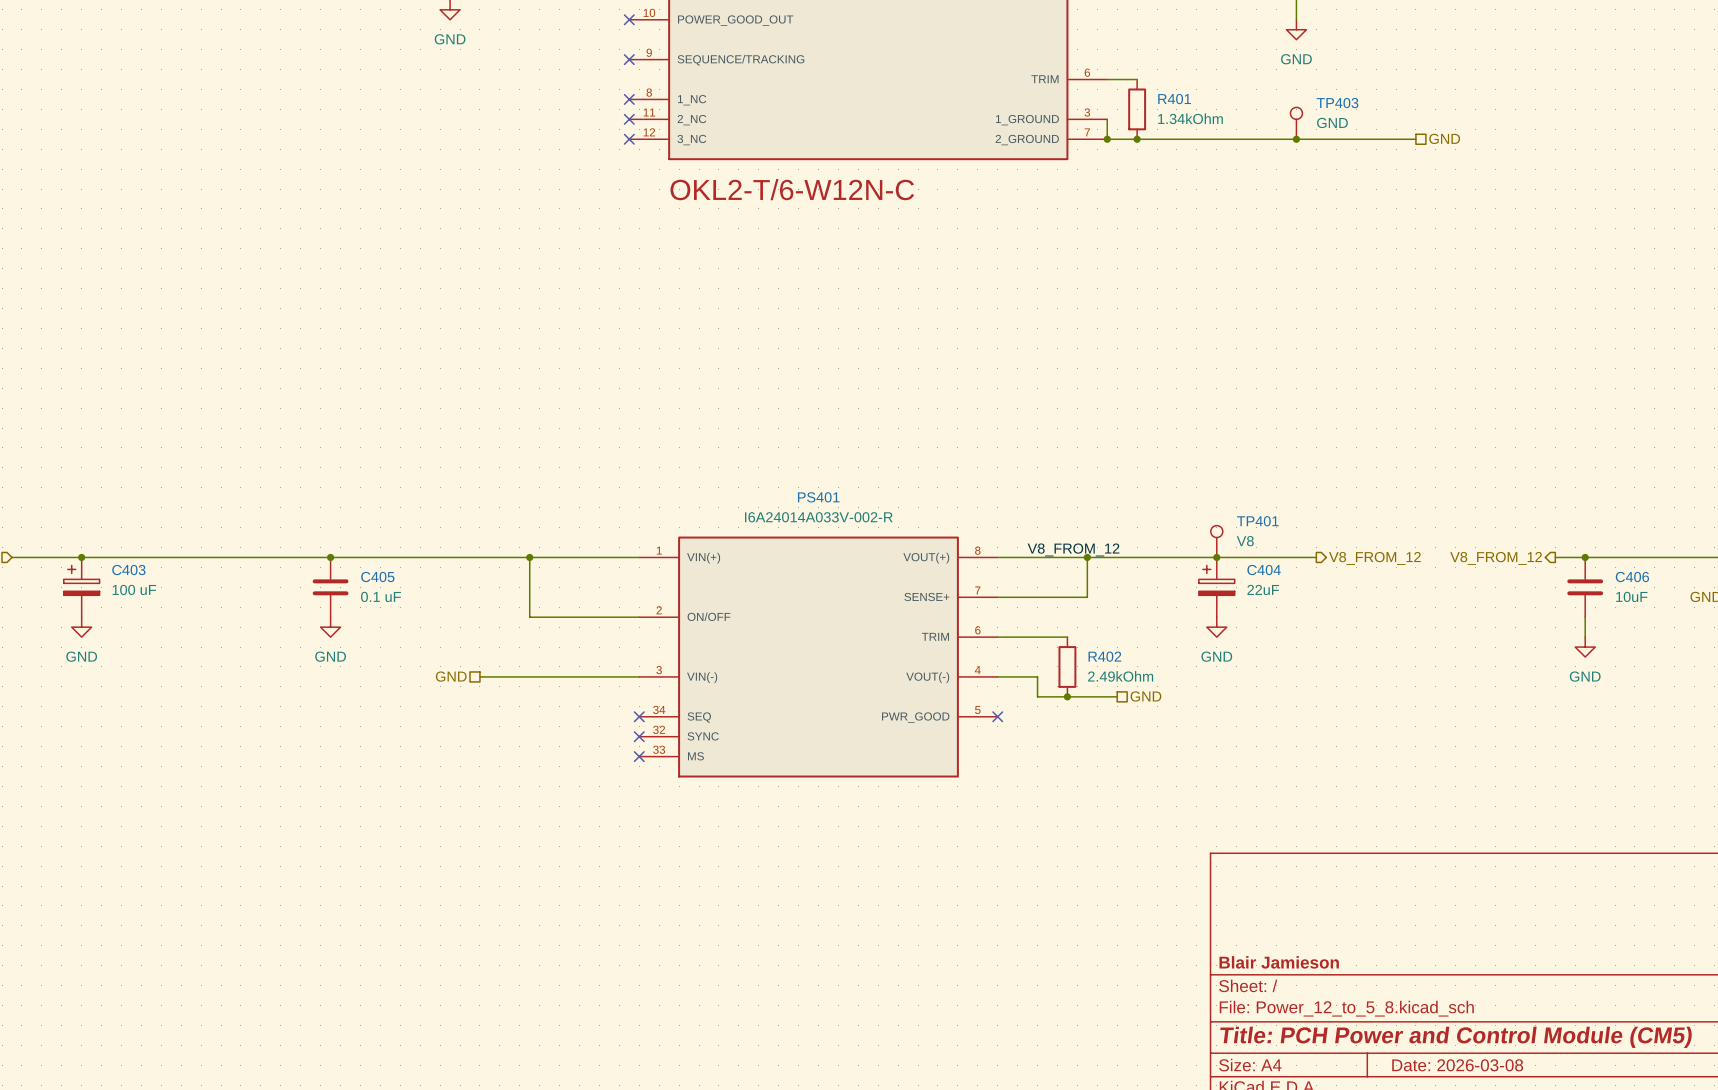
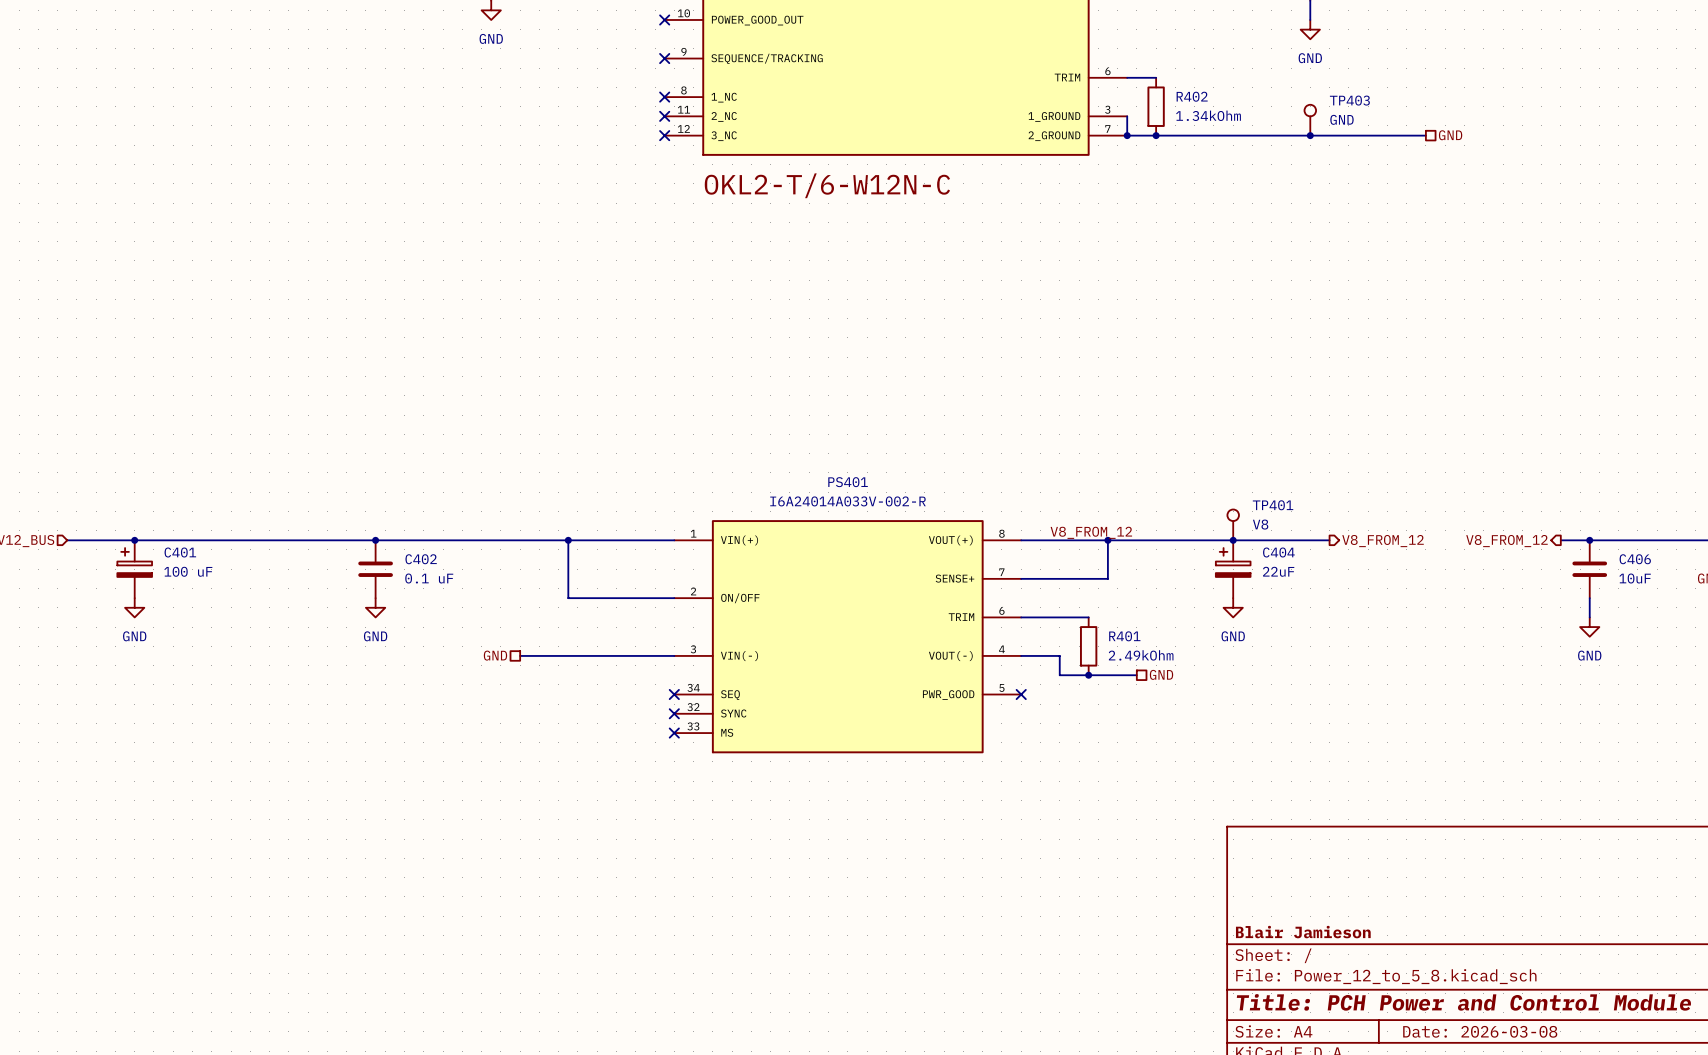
R401 name: R401 (1174, 99) -> R402 (1192, 96)
C403 name: C403 (128, 570) -> C401 (180, 552)
C405 name: C405 (377, 577) -> C402 (421, 559)
R402 name: R402 (1104, 656) -> R401 (1124, 636)

